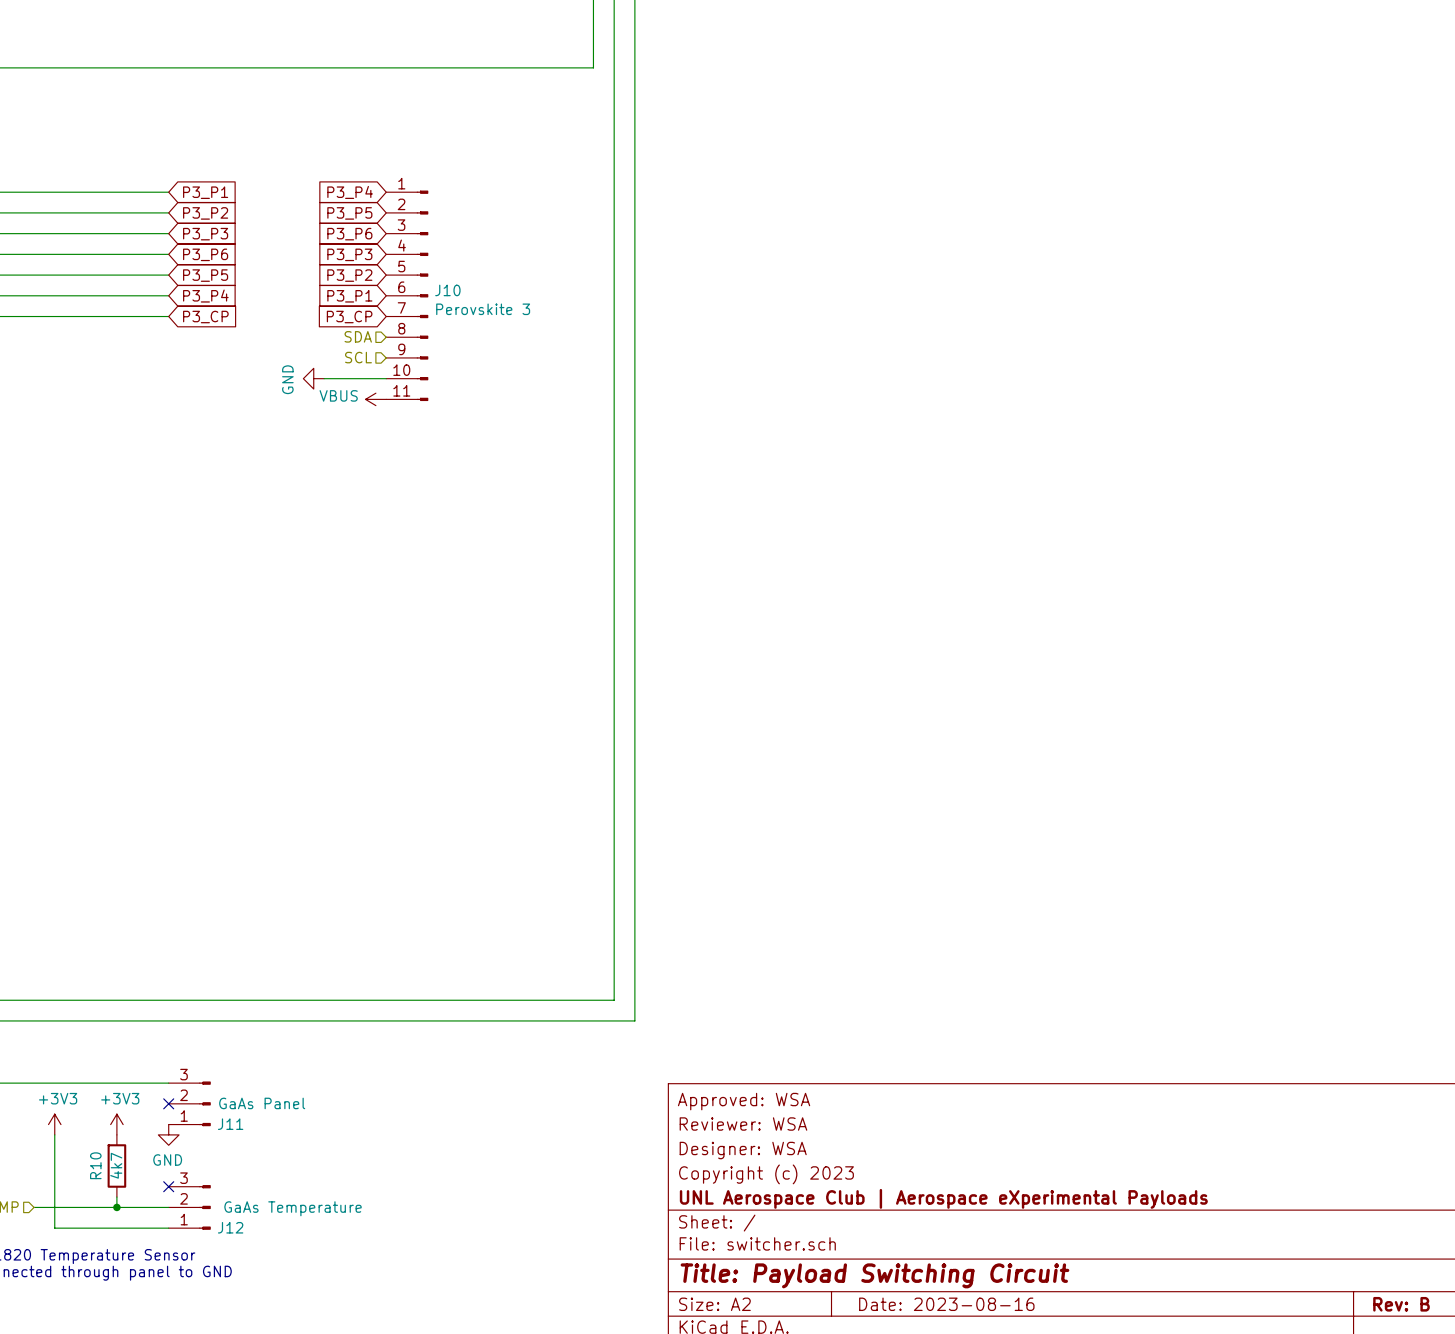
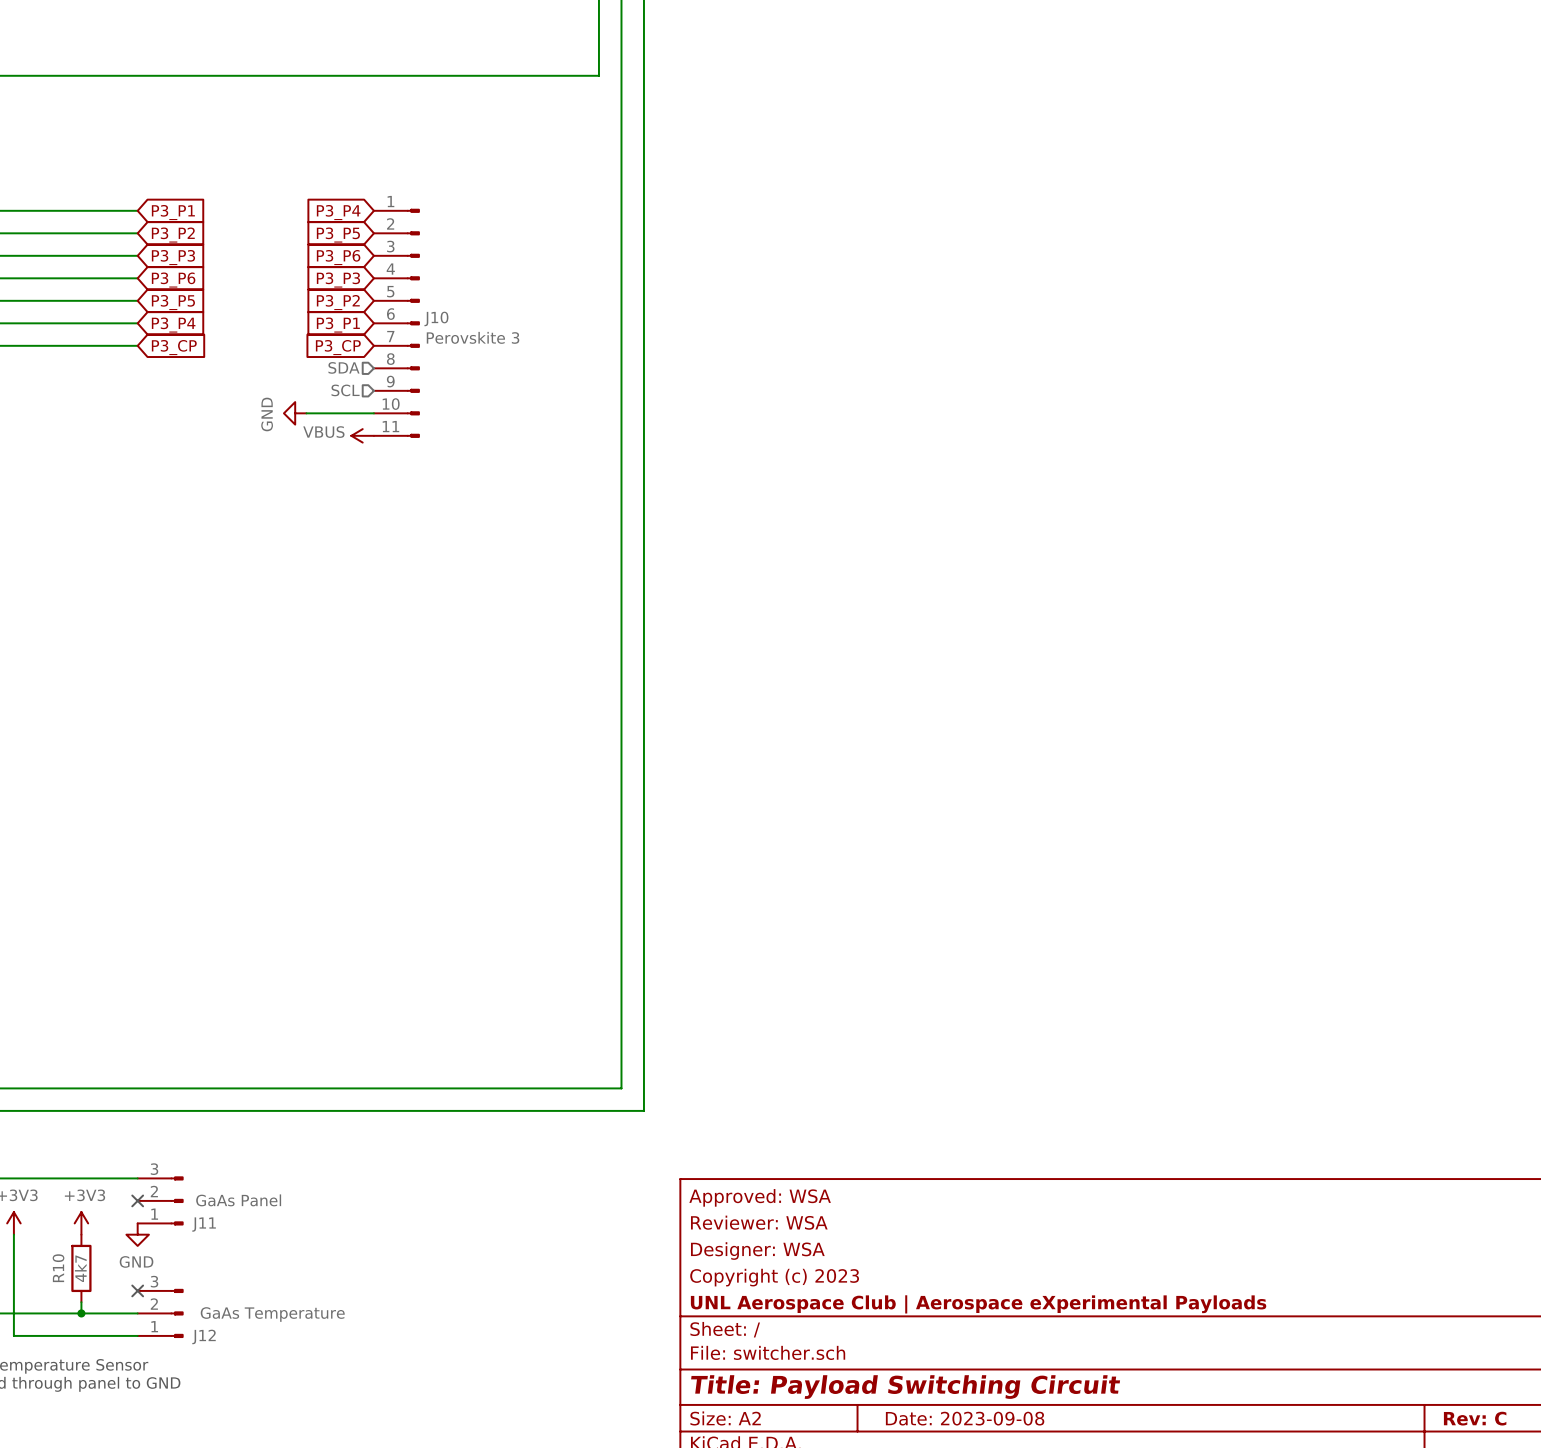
title block: Date: 2023-08-16 (946, 1304) -> Date: 2023-09-08 (965, 1418)
title block: Rev: B (1401, 1304) -> Rev: C (1475, 1418)

